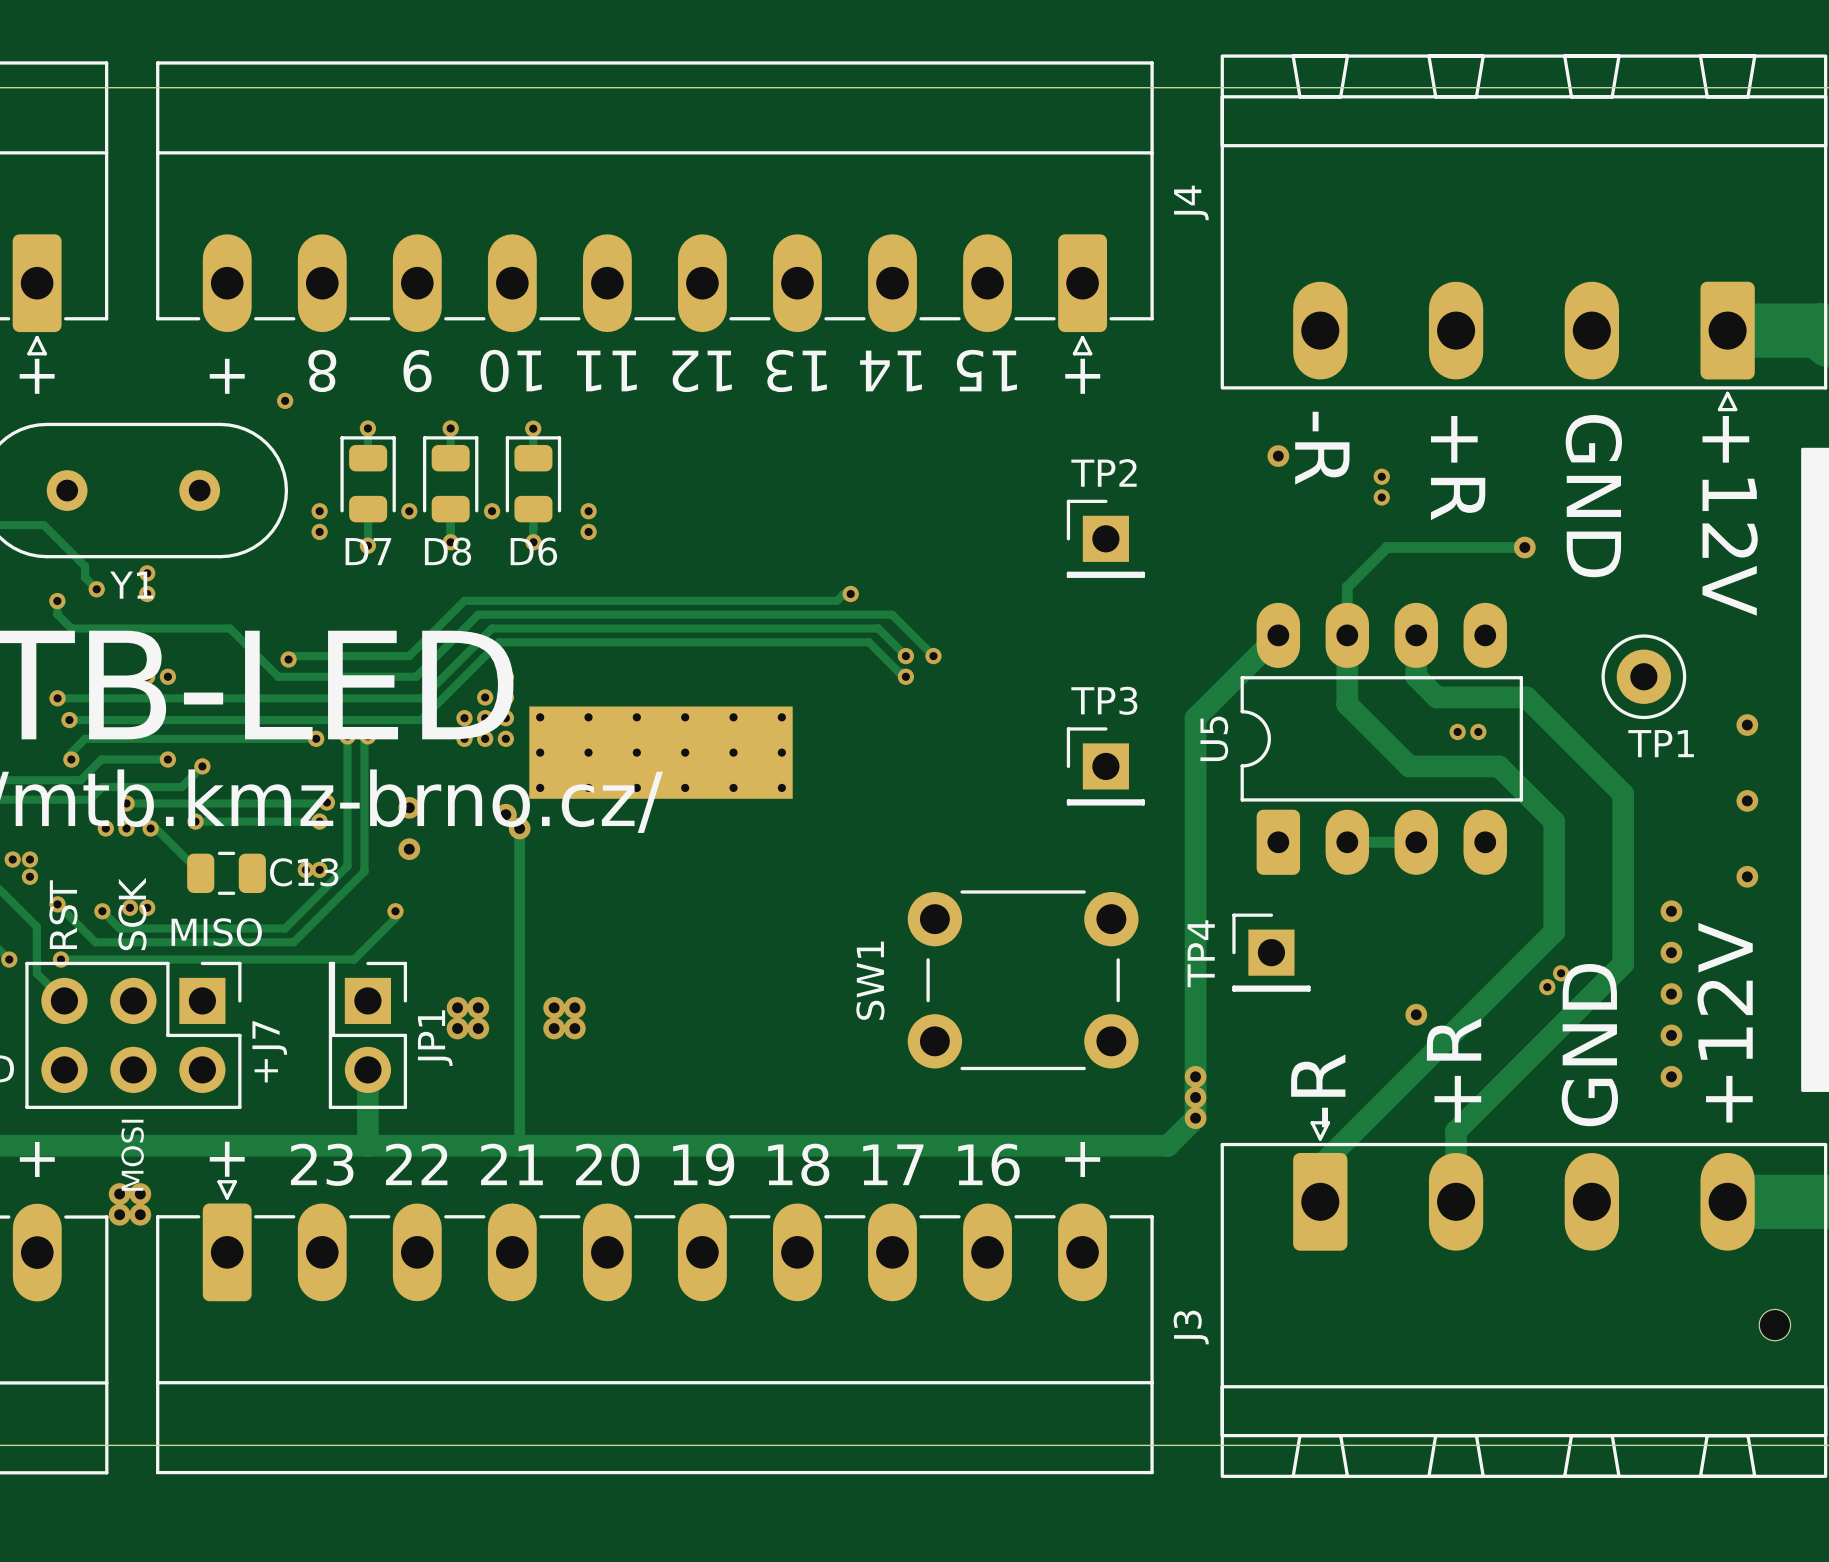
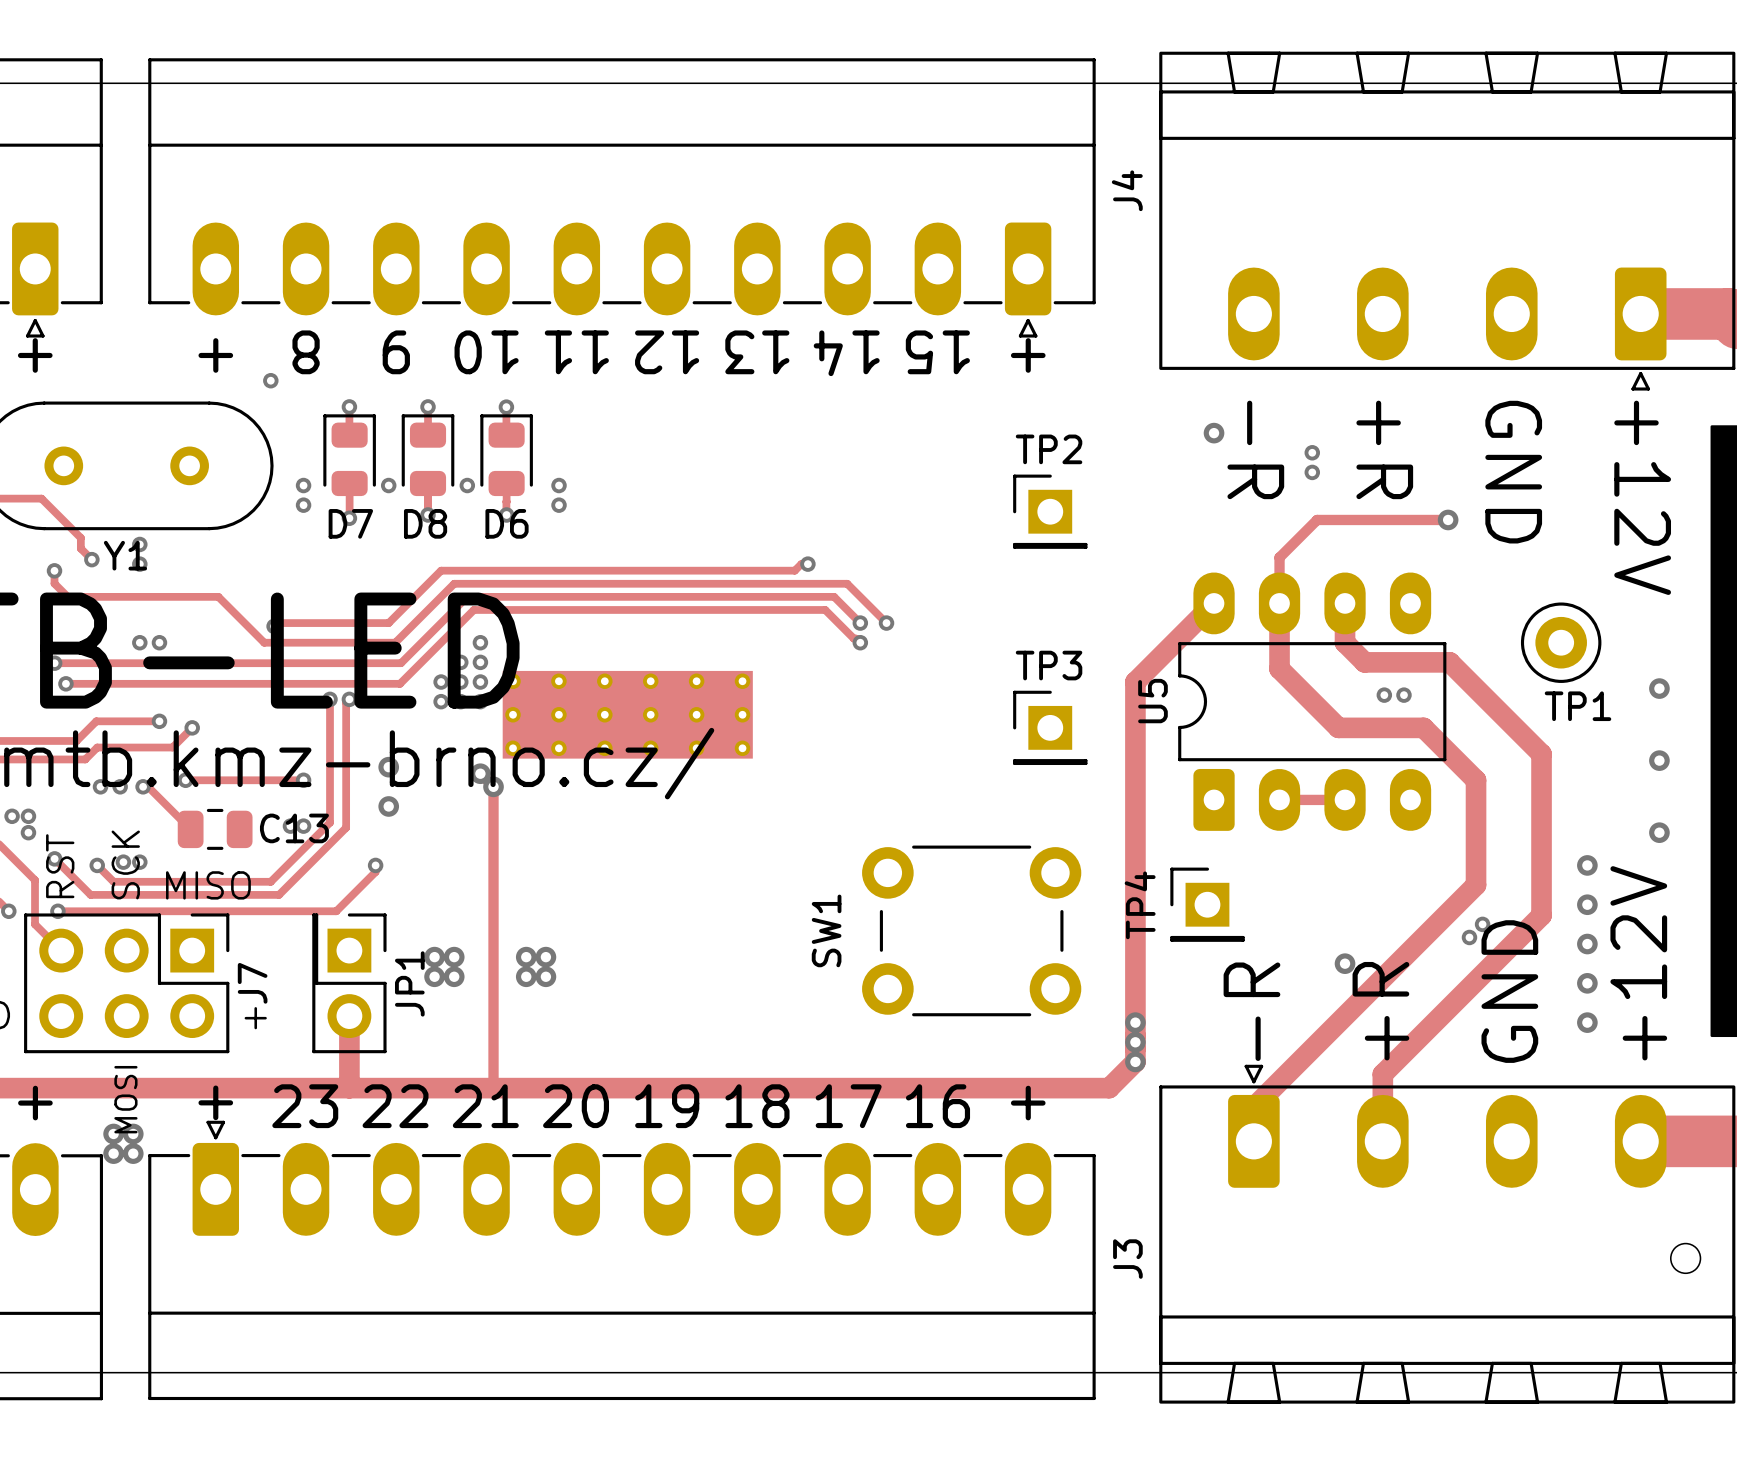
track: (316, 738) (85, 738) (71, 752) (71, 759) -> none
via: (316, 738) -> none
via: (71, 759) -> none
track: (326, 802) (126, 803) -> none
via: (326, 802) -> none
via: (126, 803) -> none

